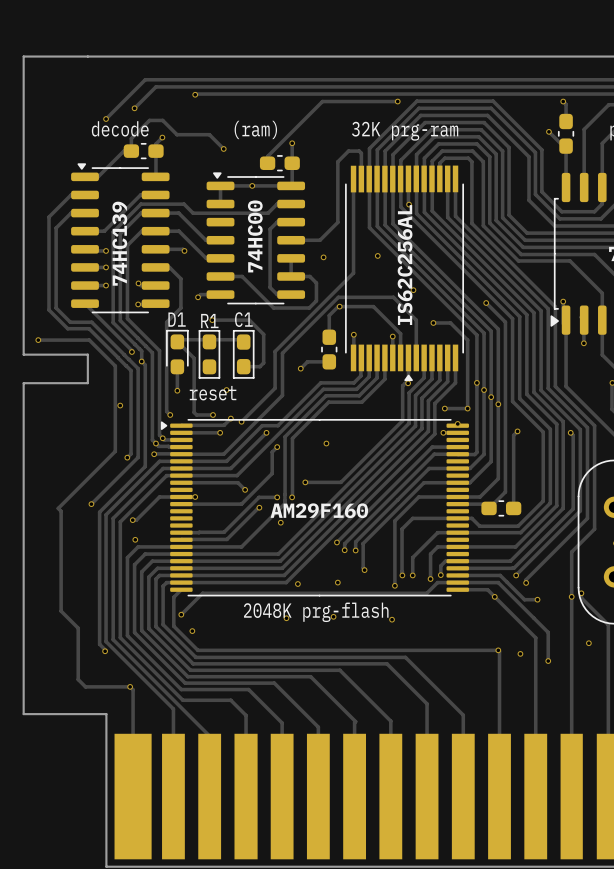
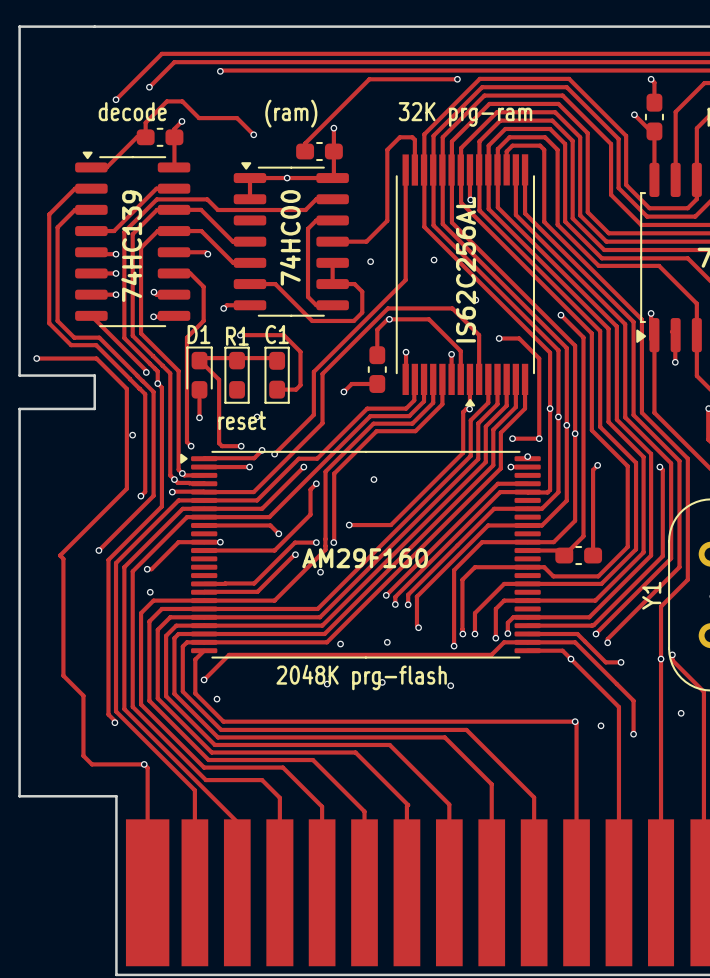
Y1 name: none -> Y1 (651, 595)

